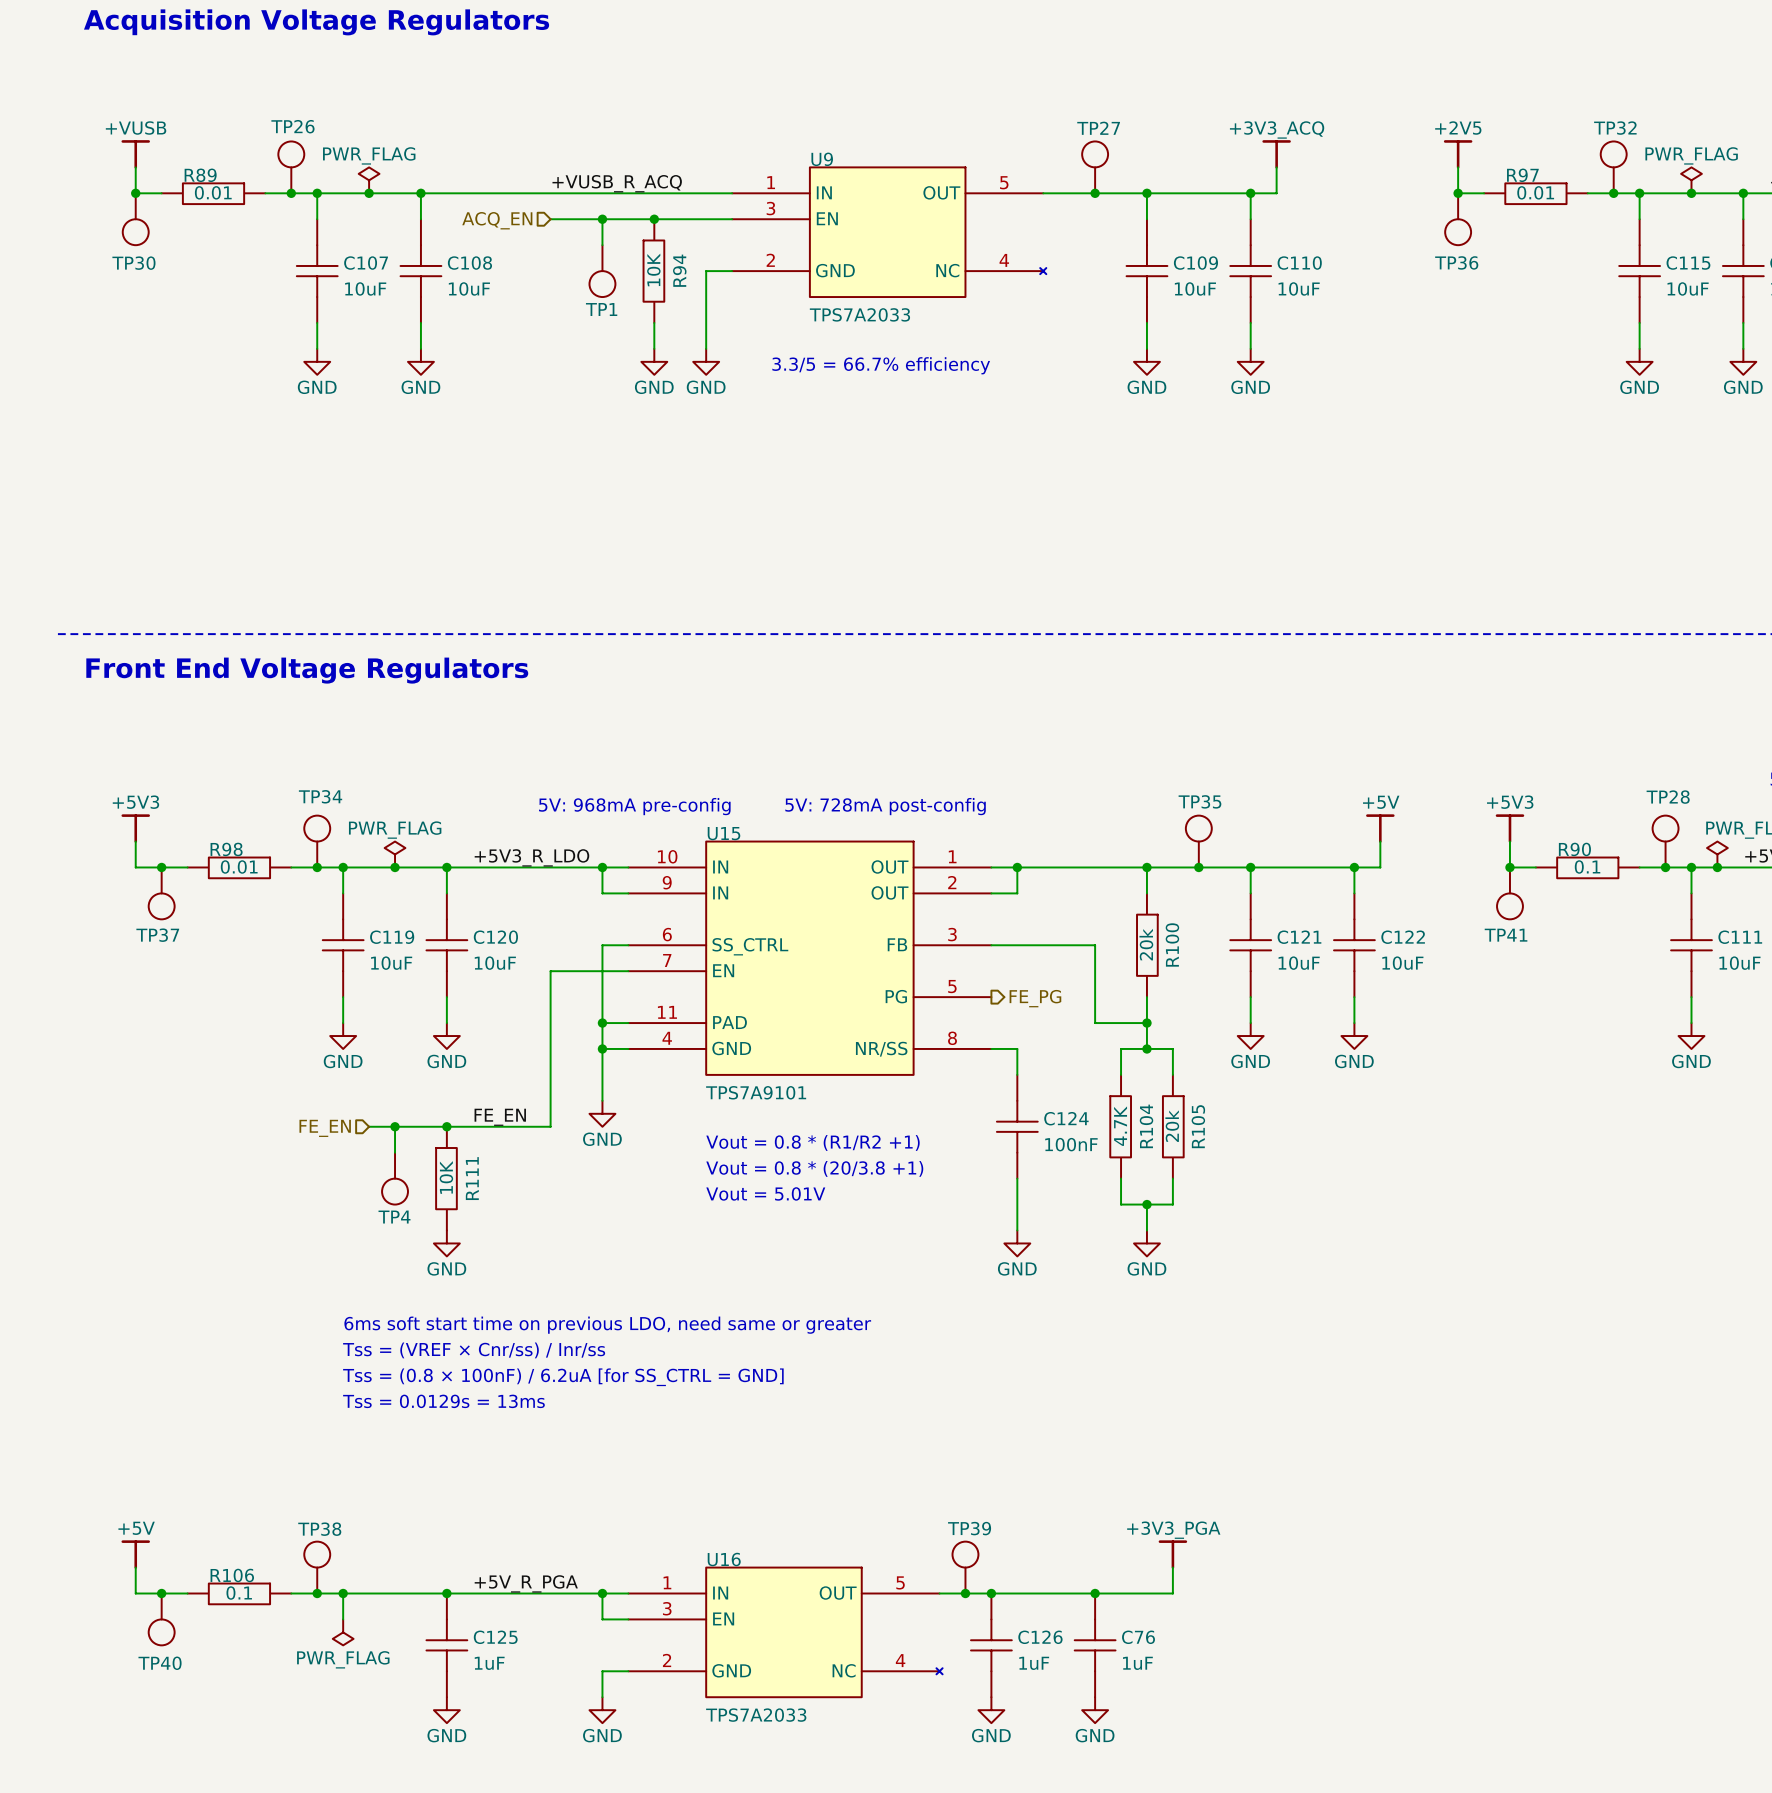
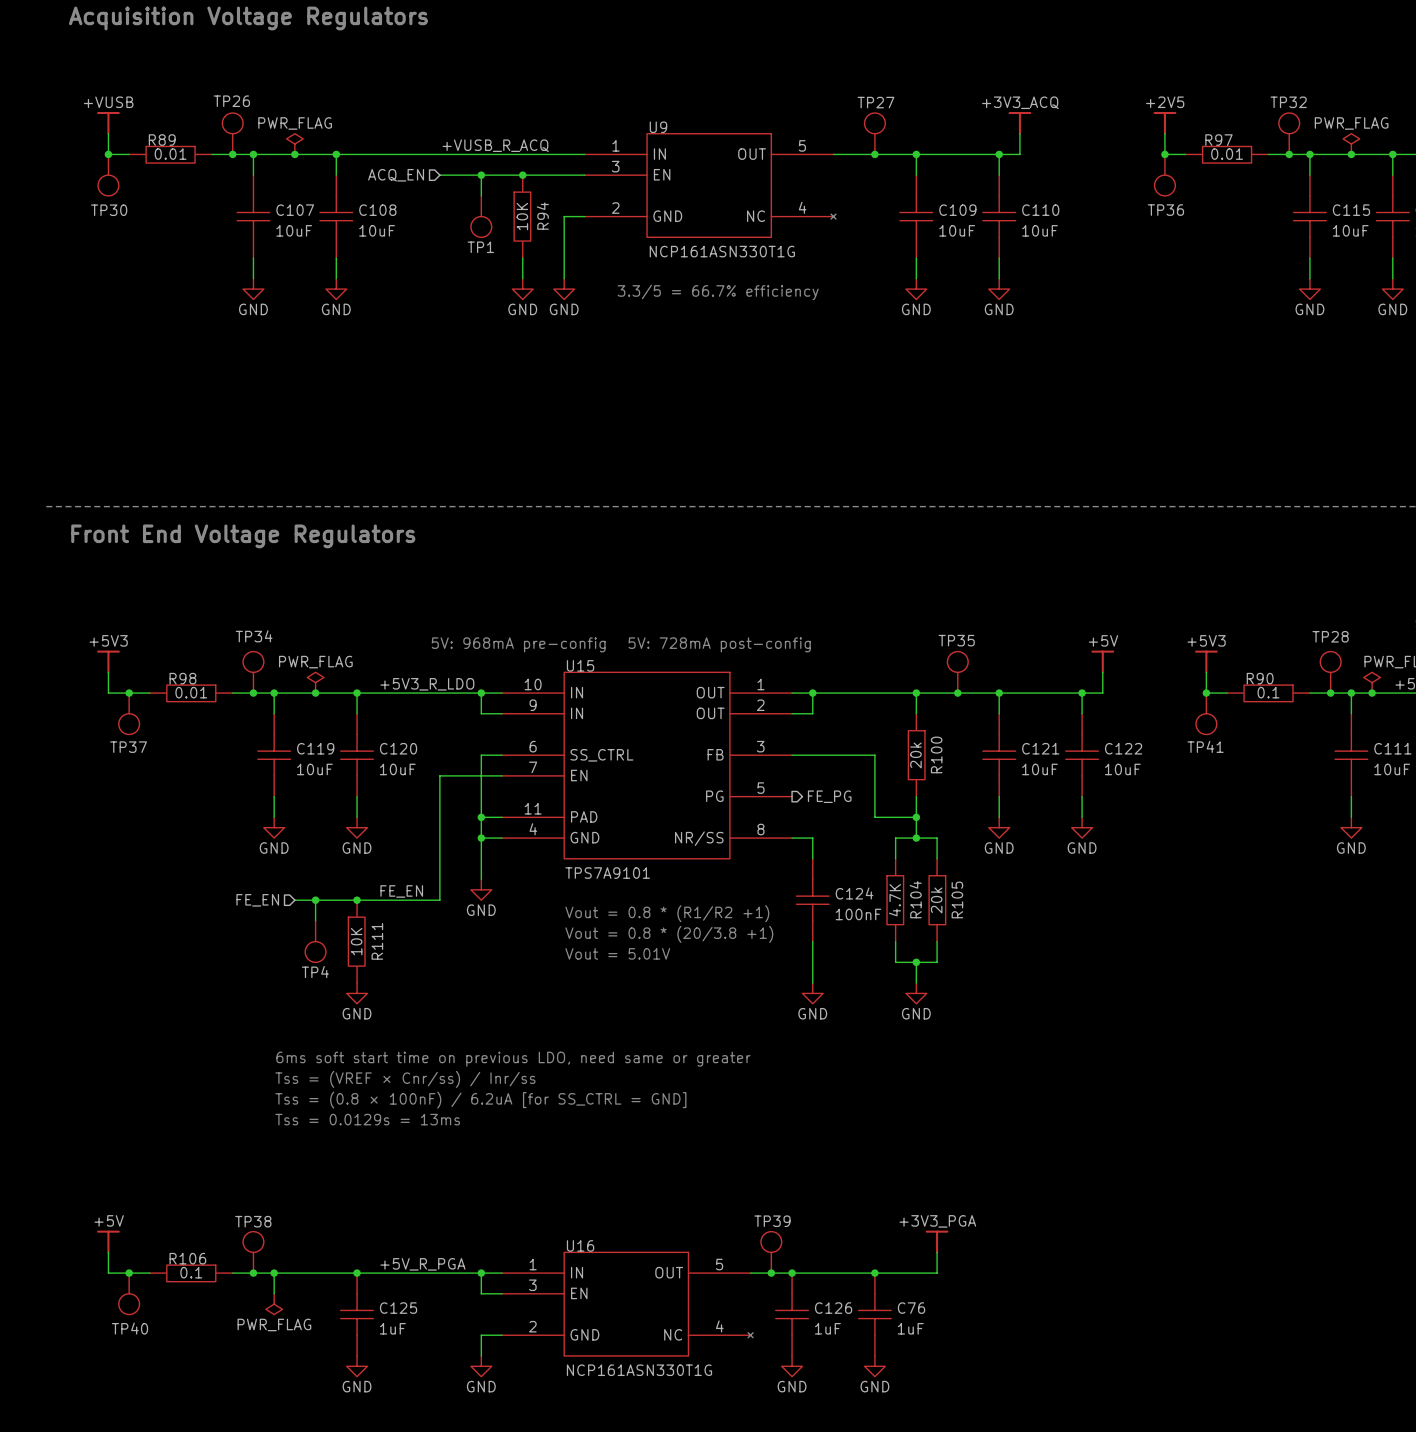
U9 value: TPS7A2033 (859, 314) -> NCP161ASN330T1G (722, 251)
U16 value: TPS7A2033 (756, 1715) -> NCP161ASN330T1G (639, 1370)

